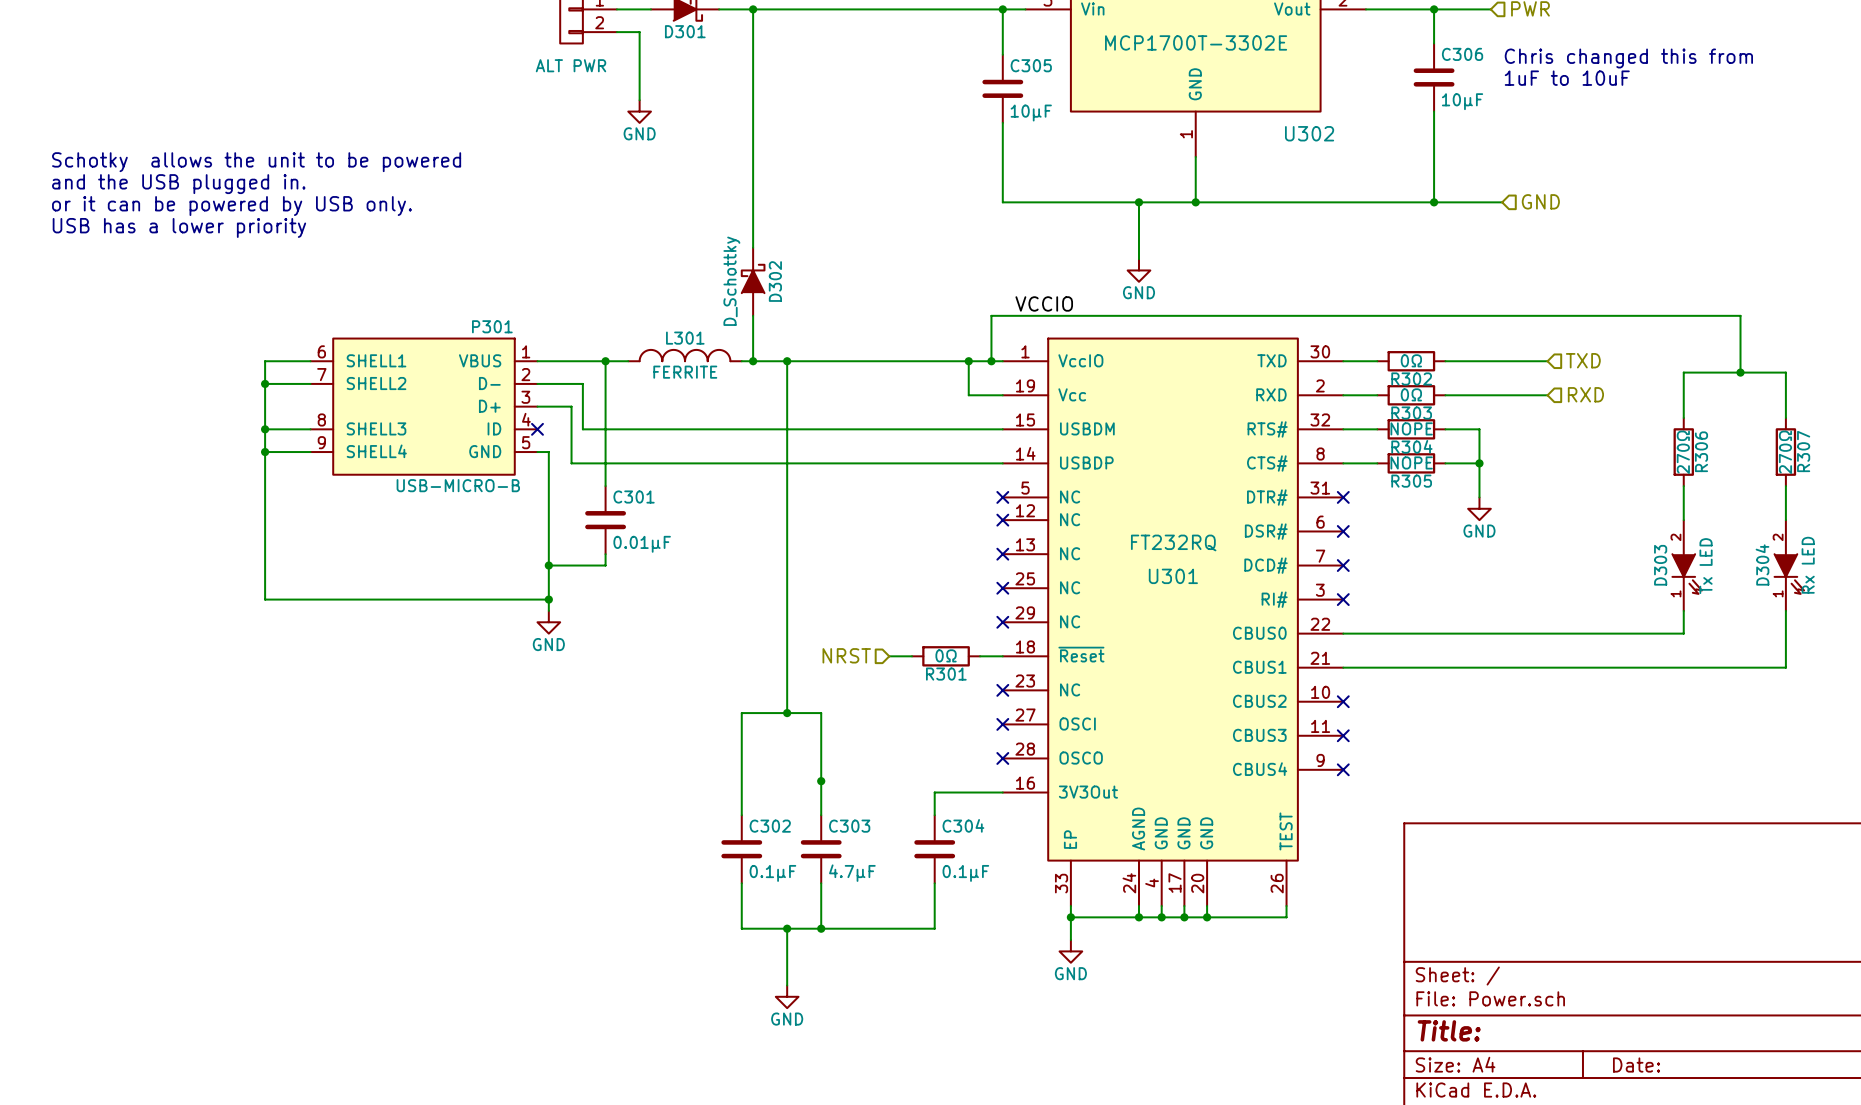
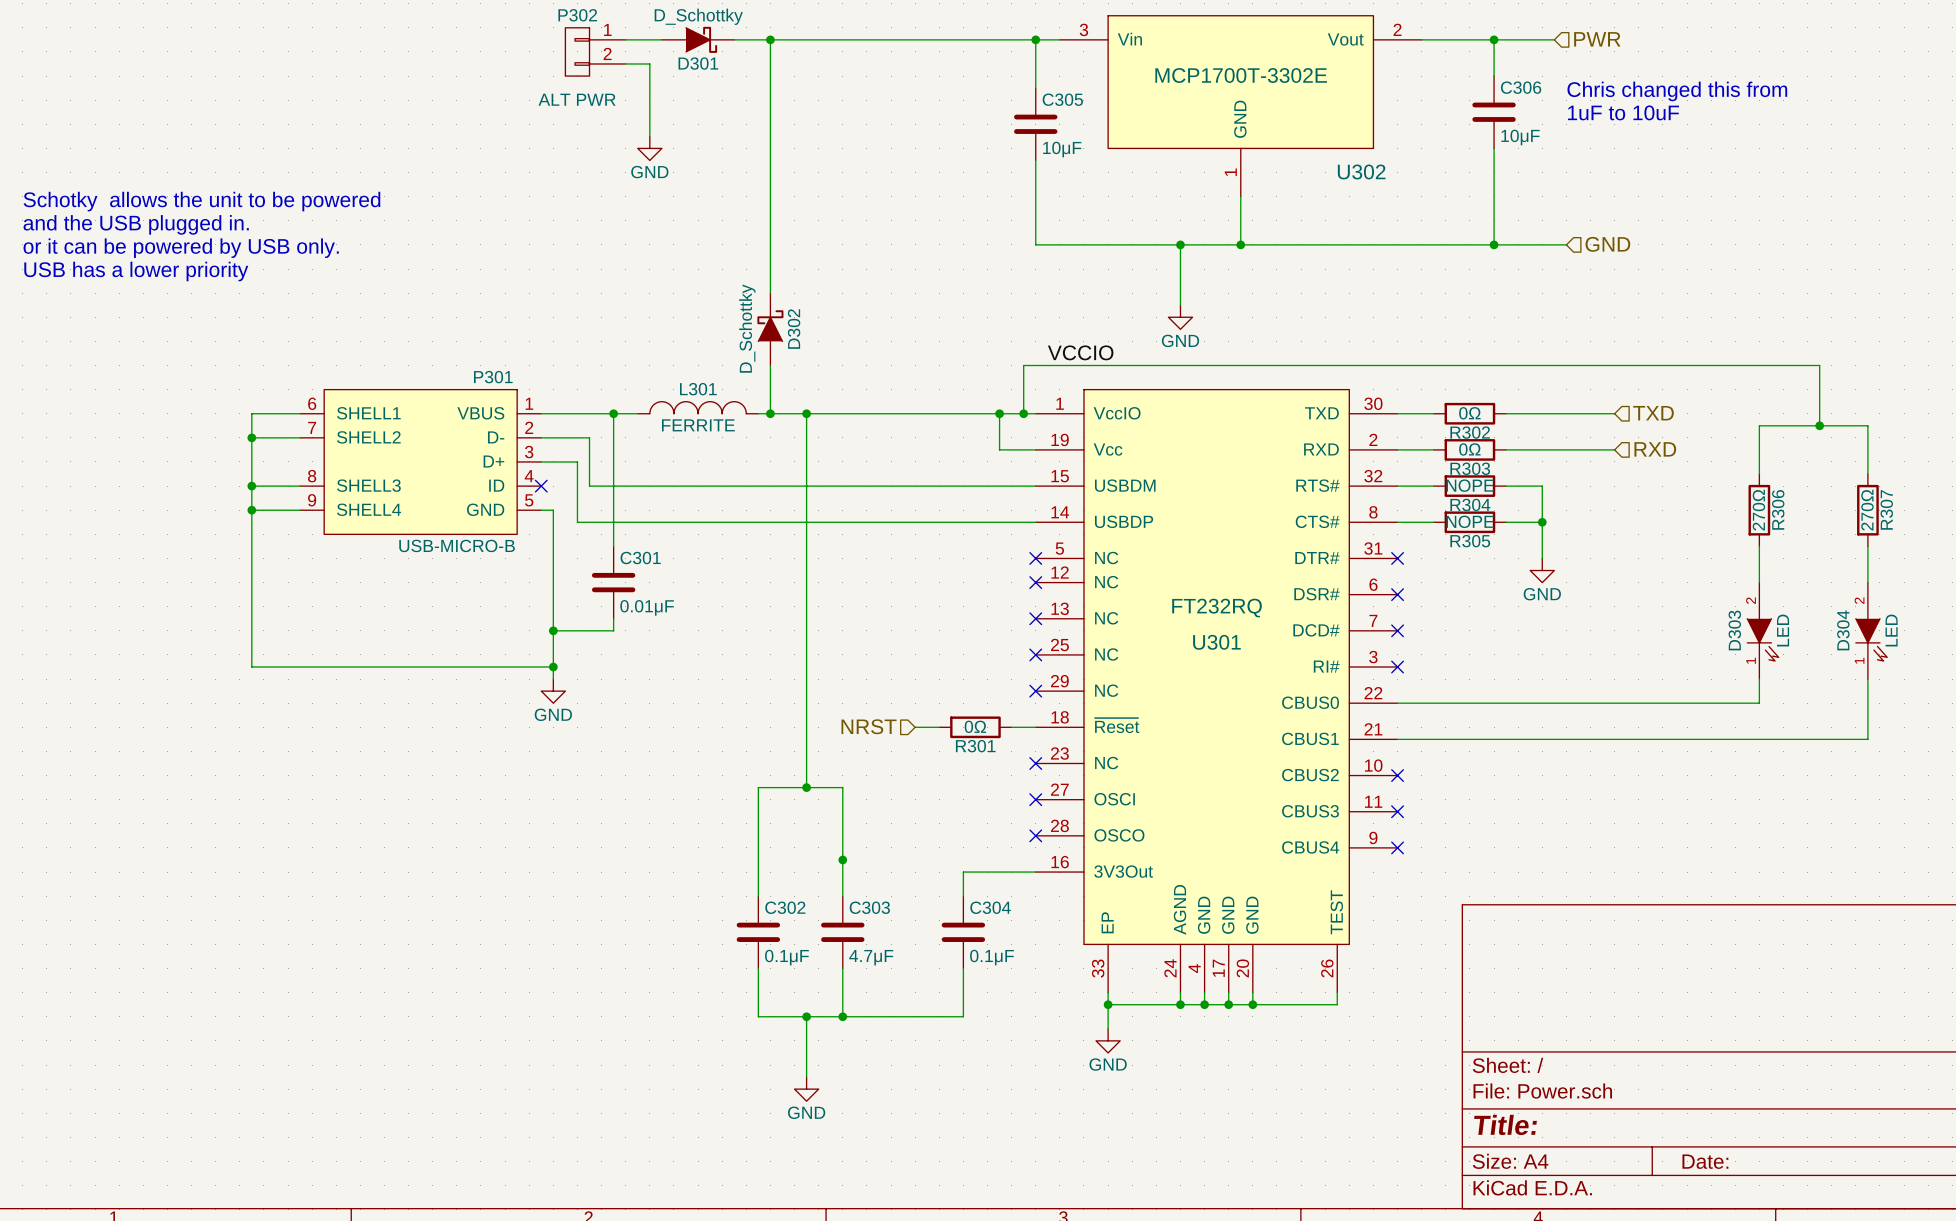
D304 value: Rx LED (1808, 565) -> LED (1891, 630)
D303 value: Tx LED (1706, 566) -> LED (1783, 630)

